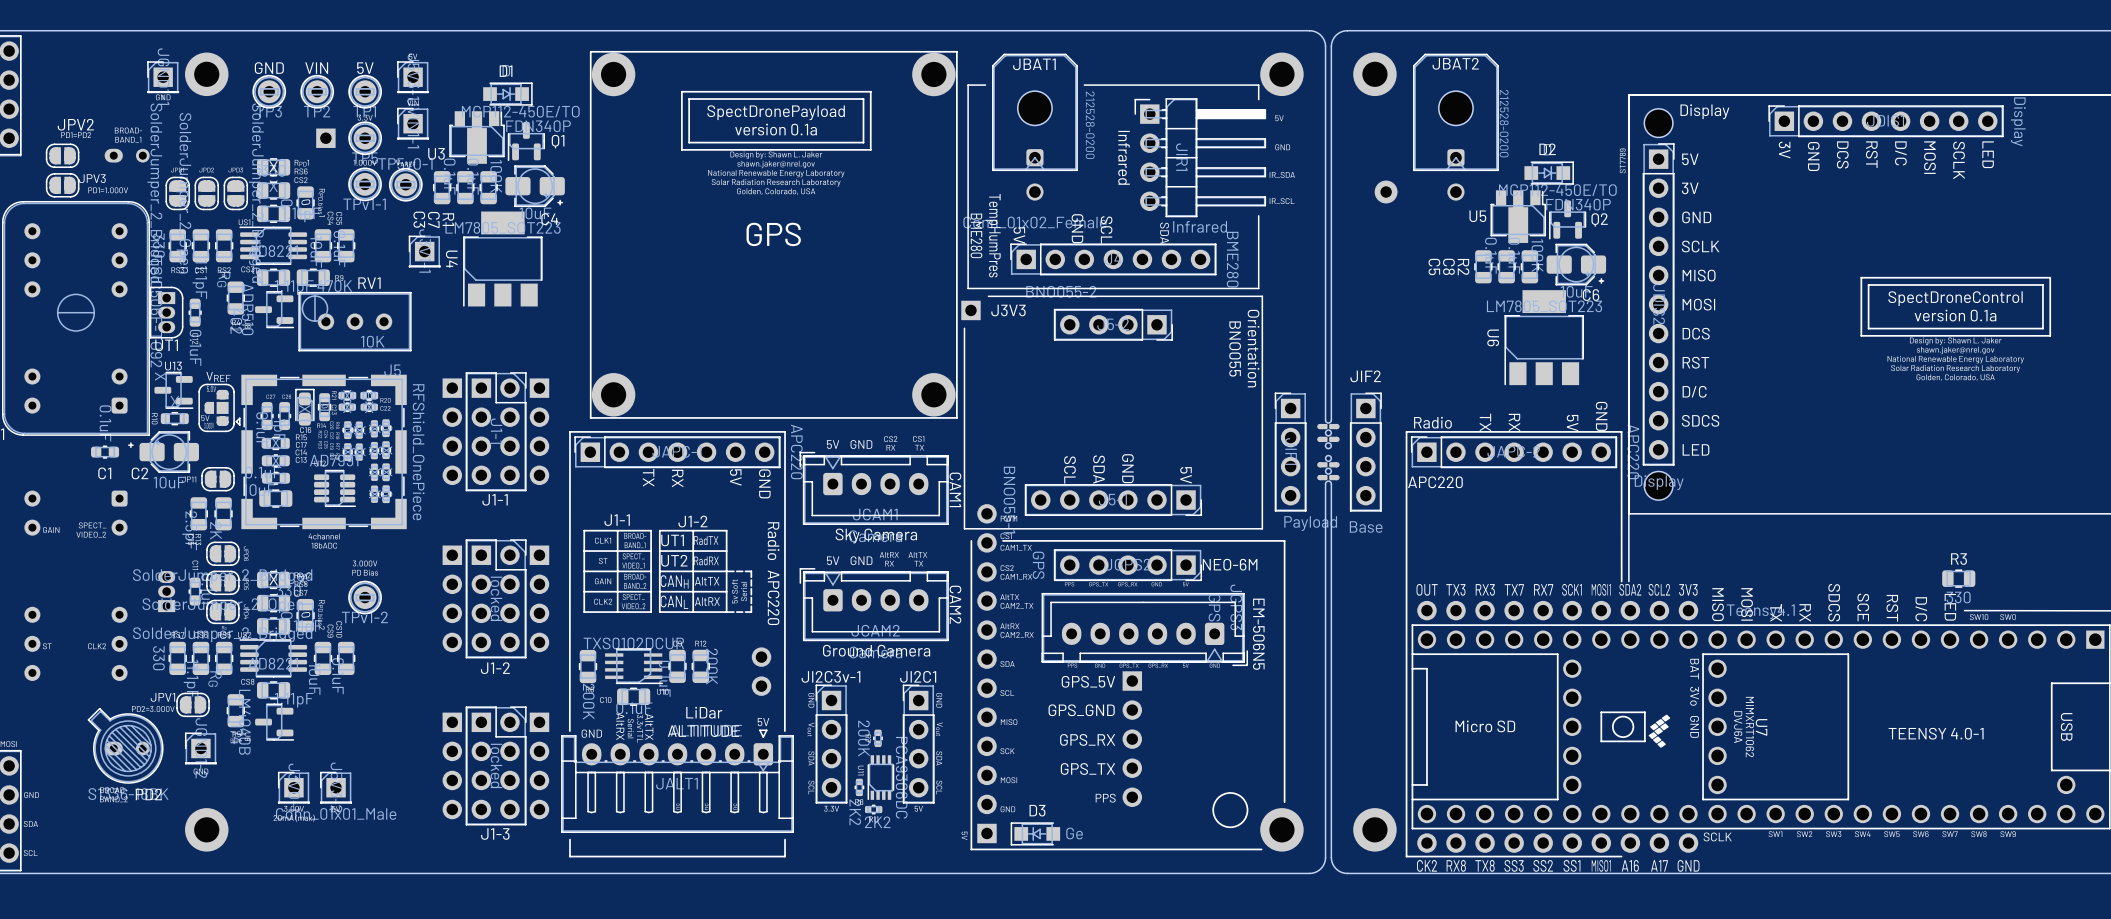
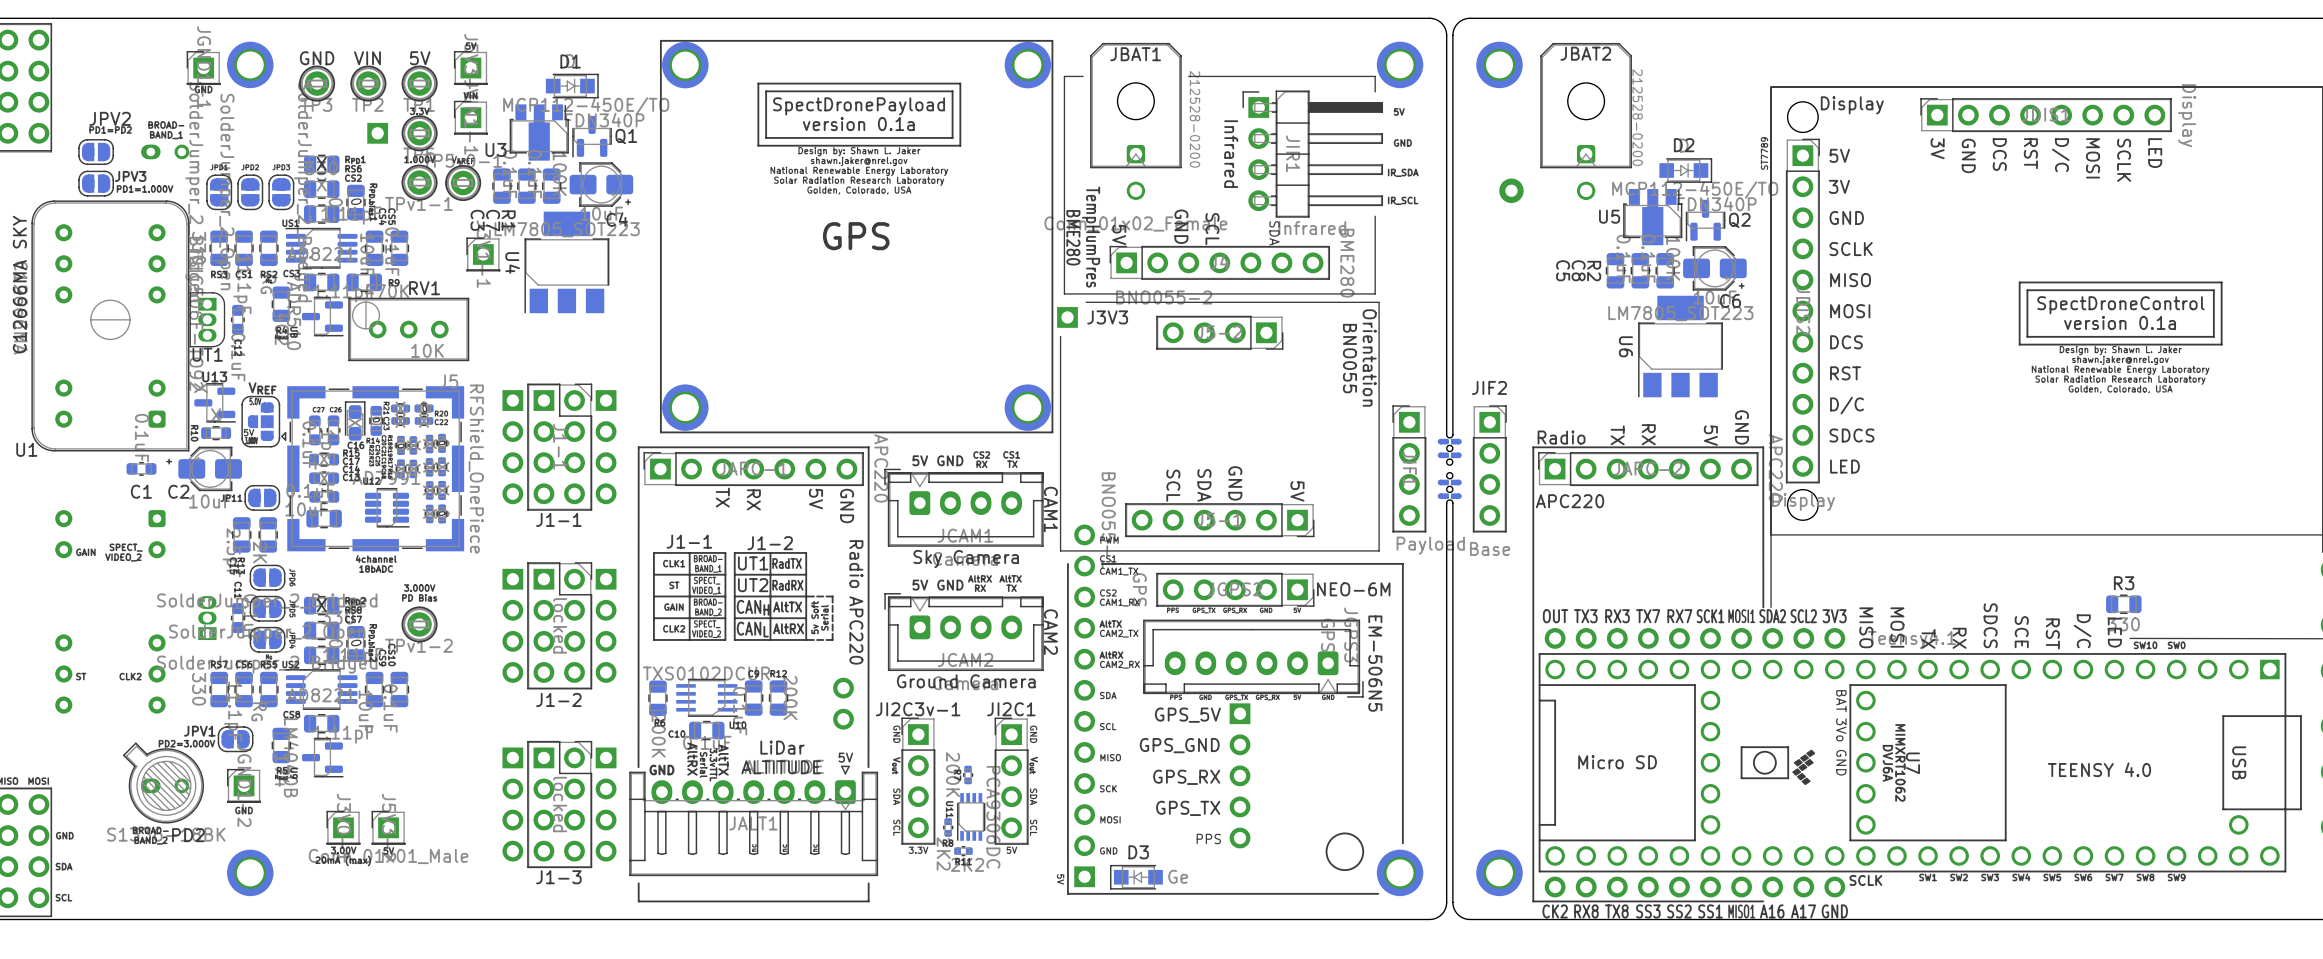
text: TEENSY 4.0-1 (1936, 733) -> TEENSY 4.0 (2099, 769)

